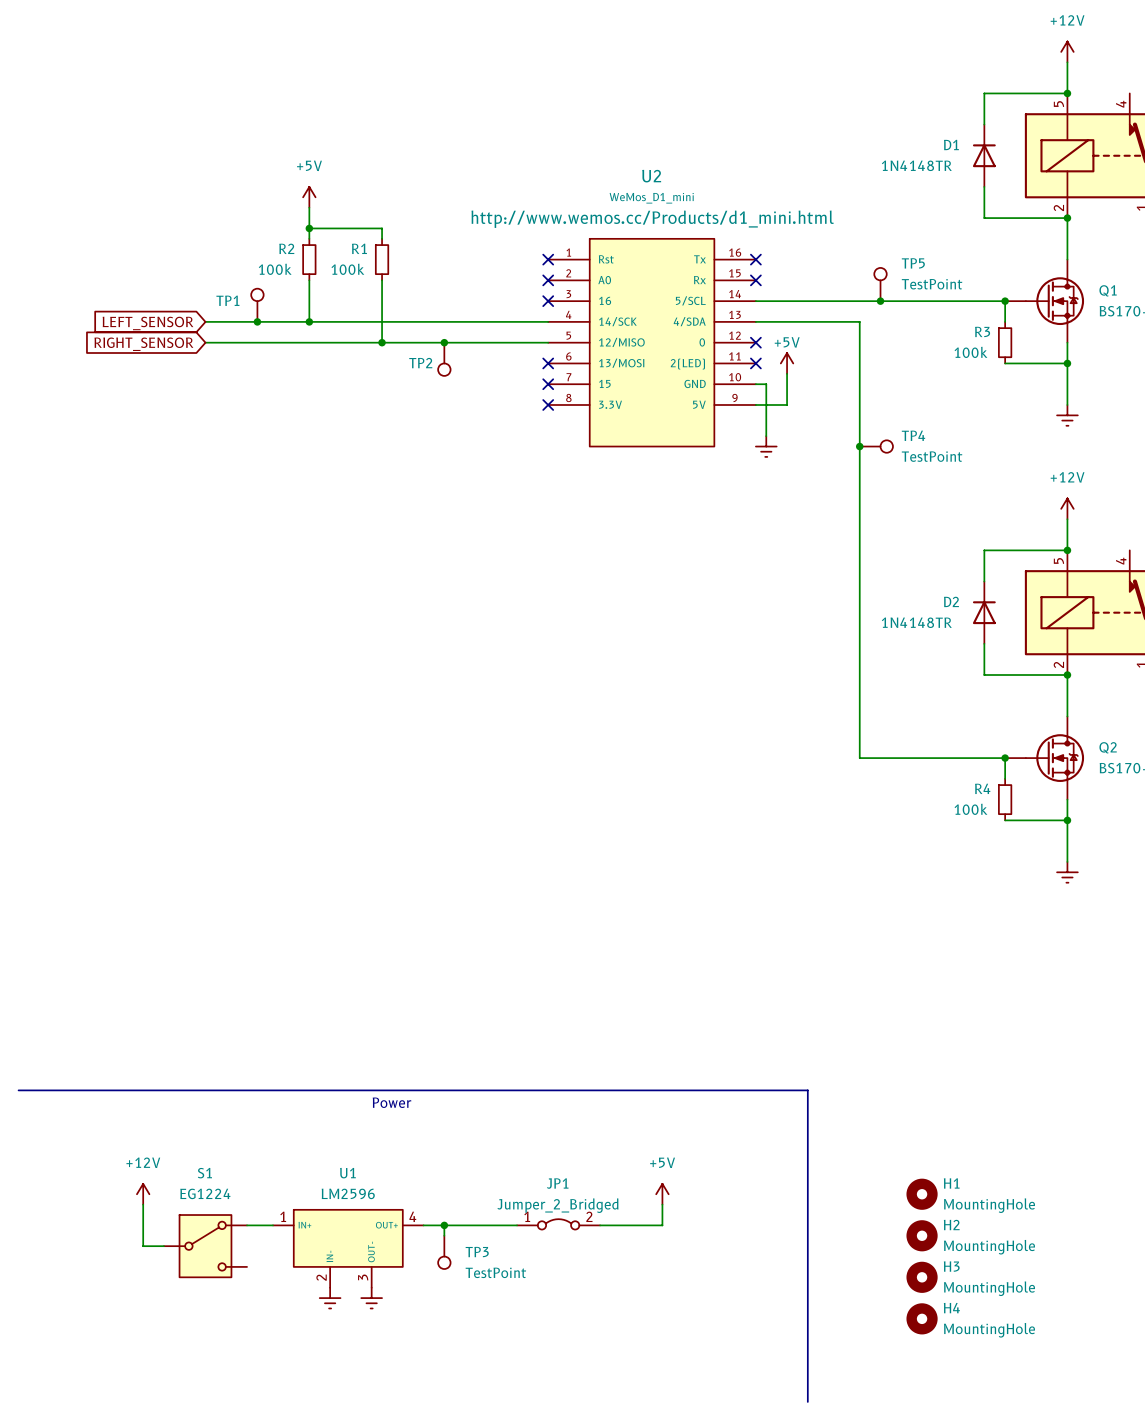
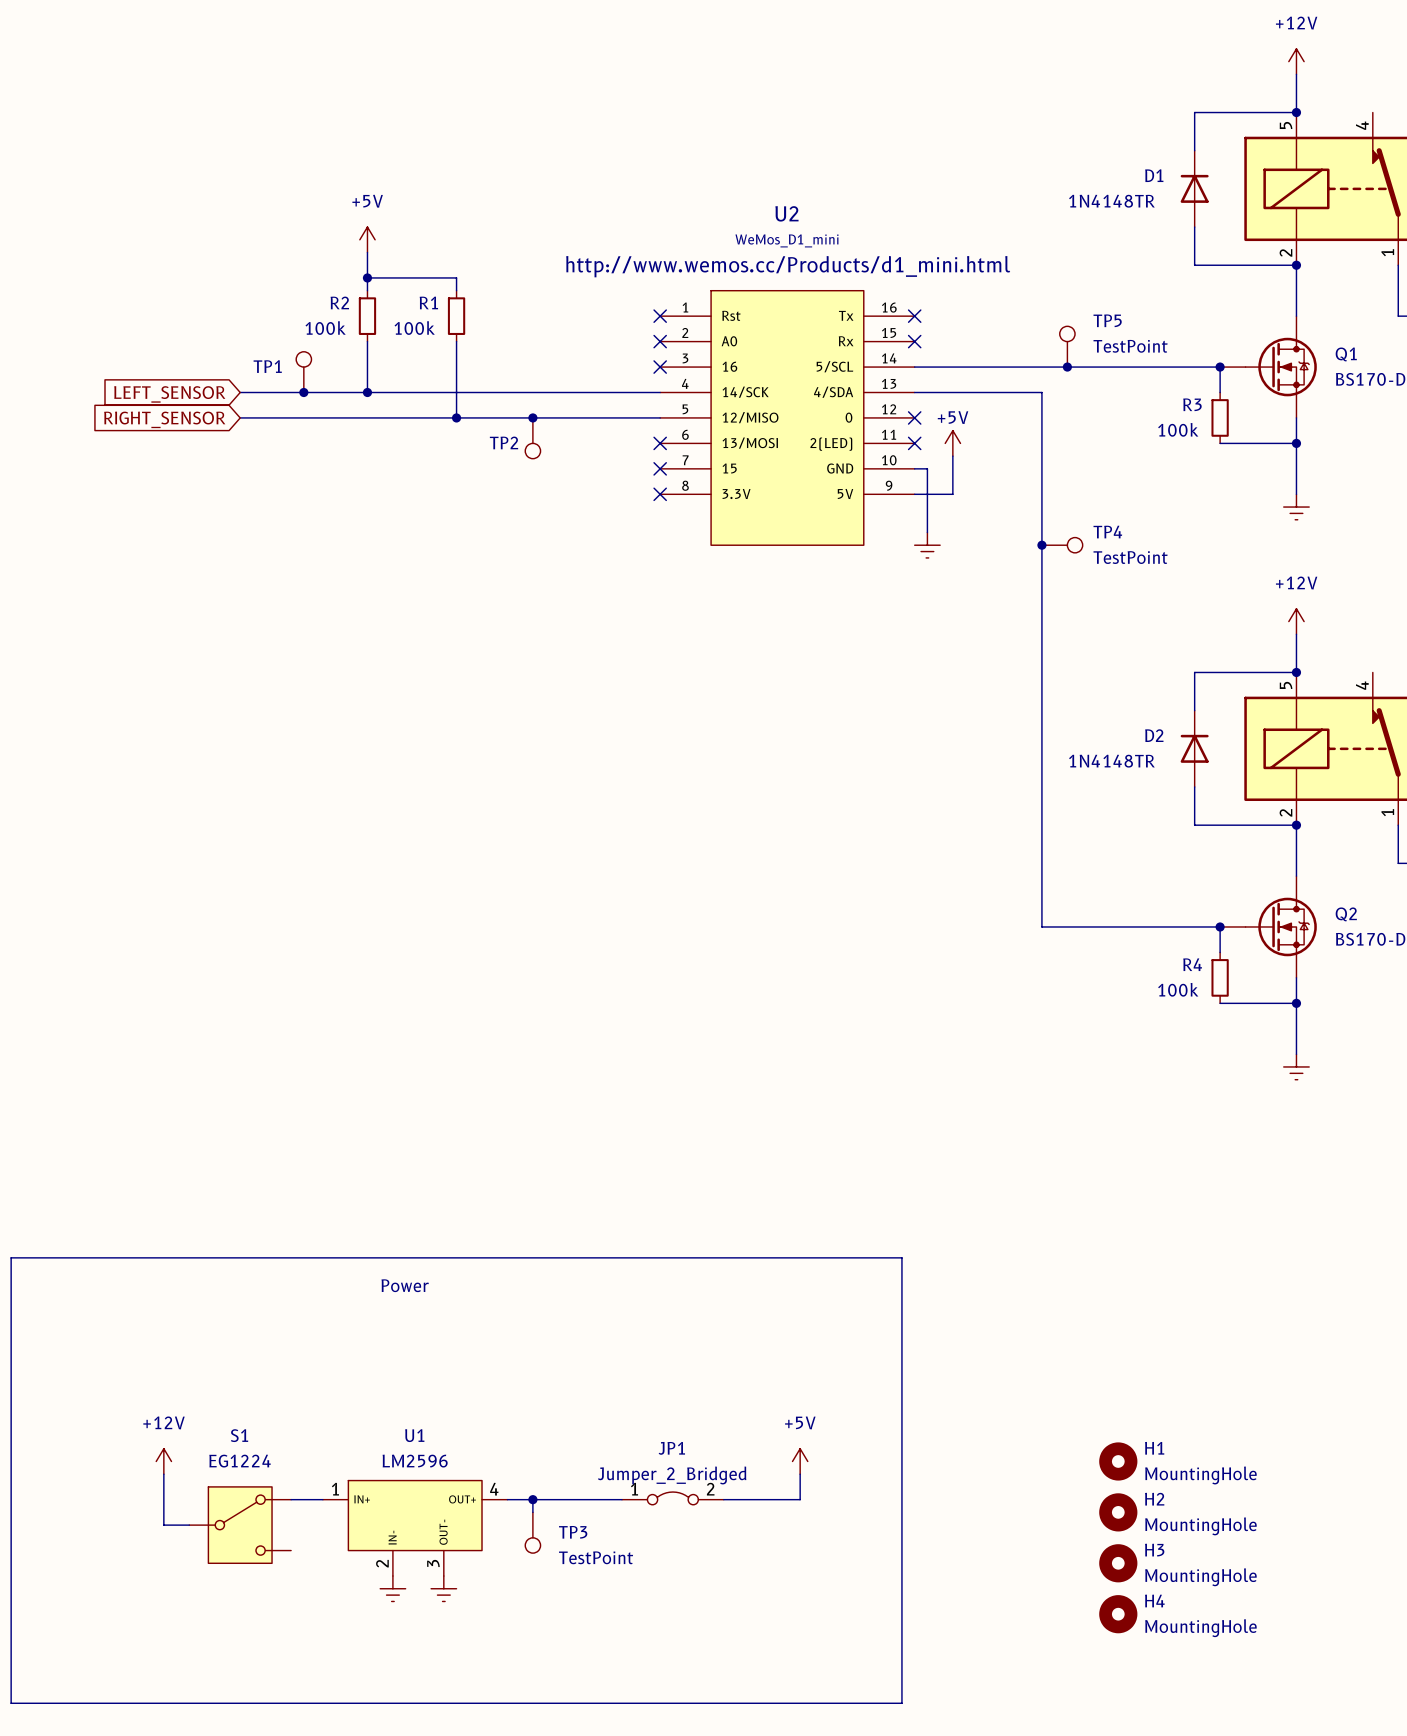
line: none -> (11, 1257) (901, 1257) (901, 1703) (11, 1703) (11, 1257)
line: (18, 1090) (807, 1090) (807, 1401) -> none
text position: Power (391, 1102) -> Power (405, 1285)

